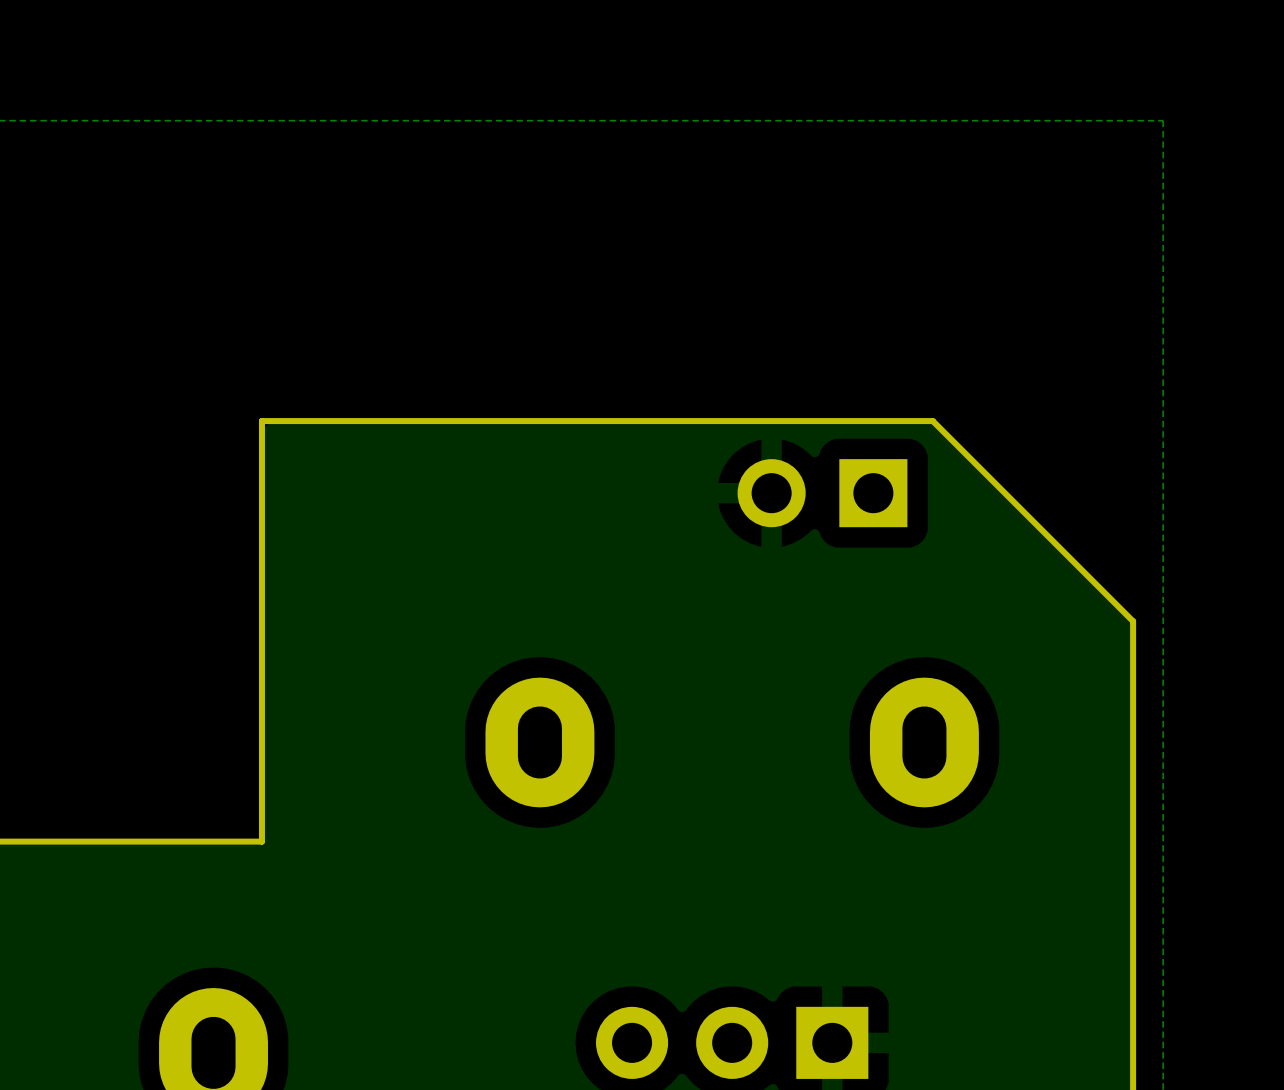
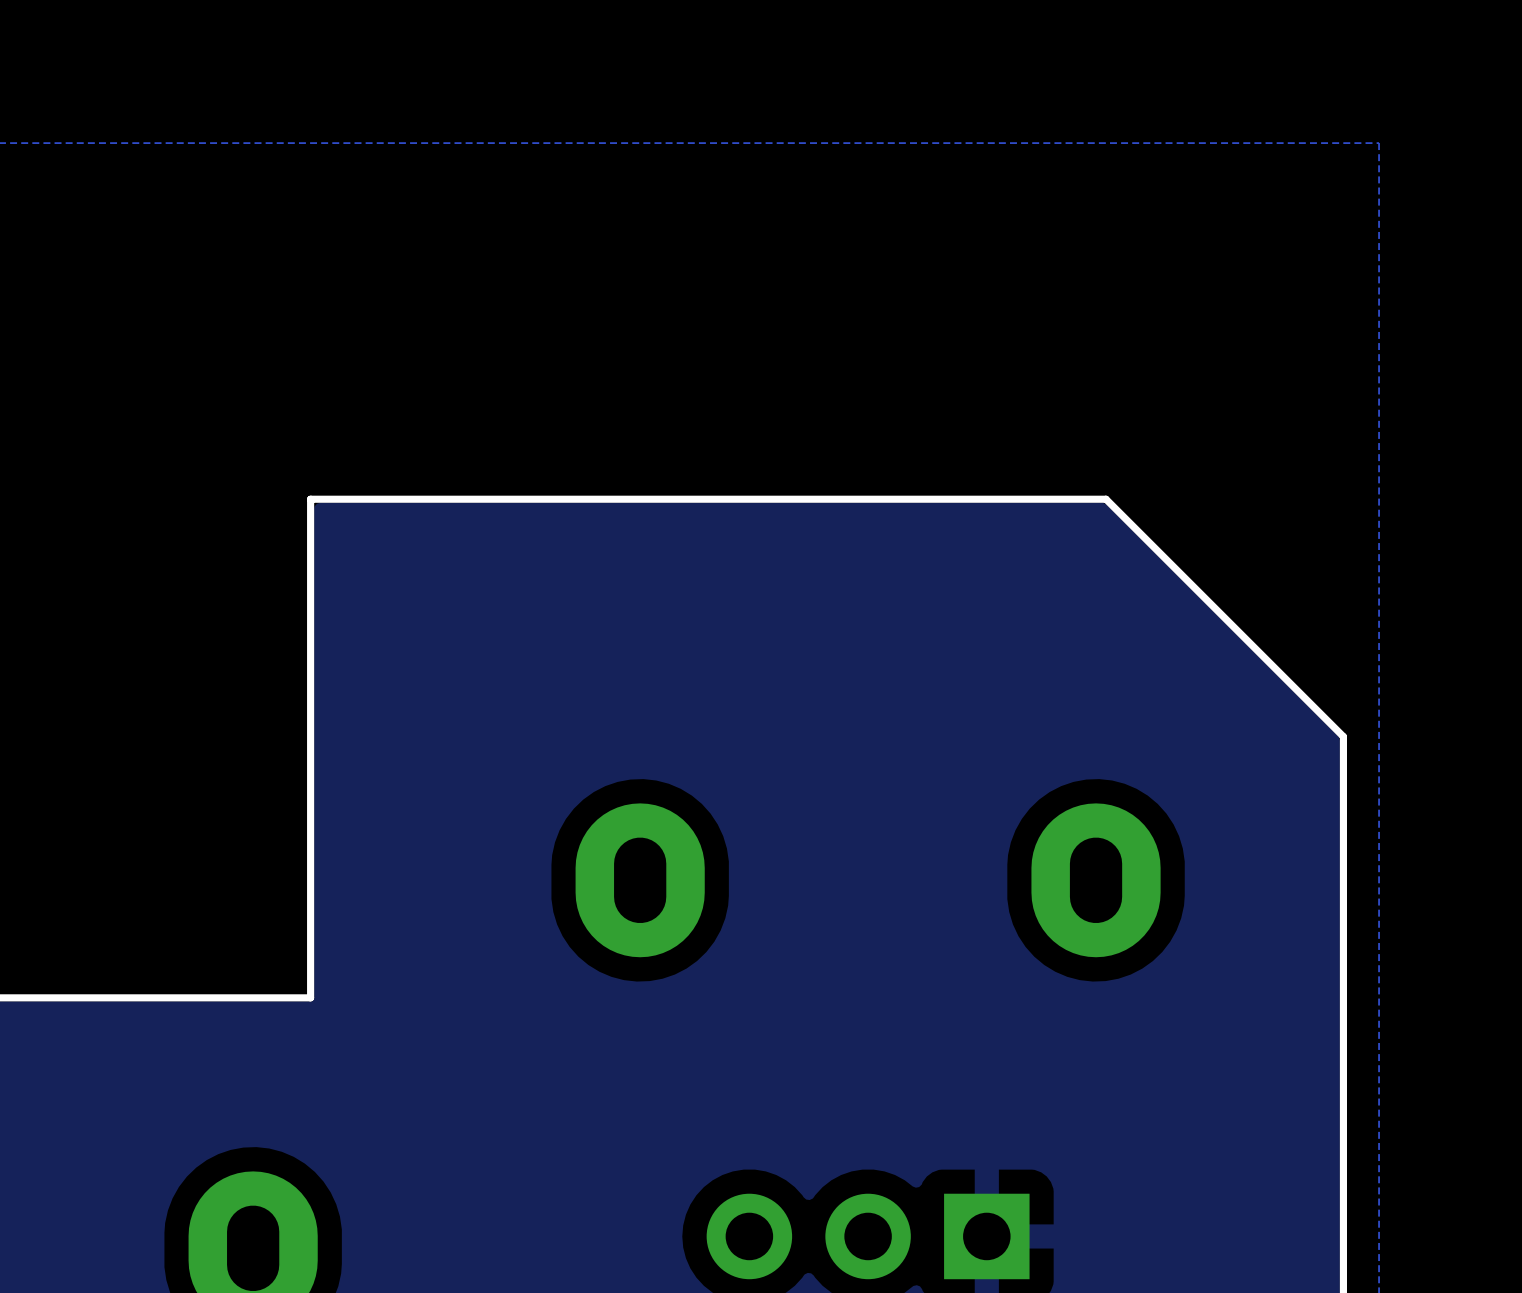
part: (822, 493) -> none

